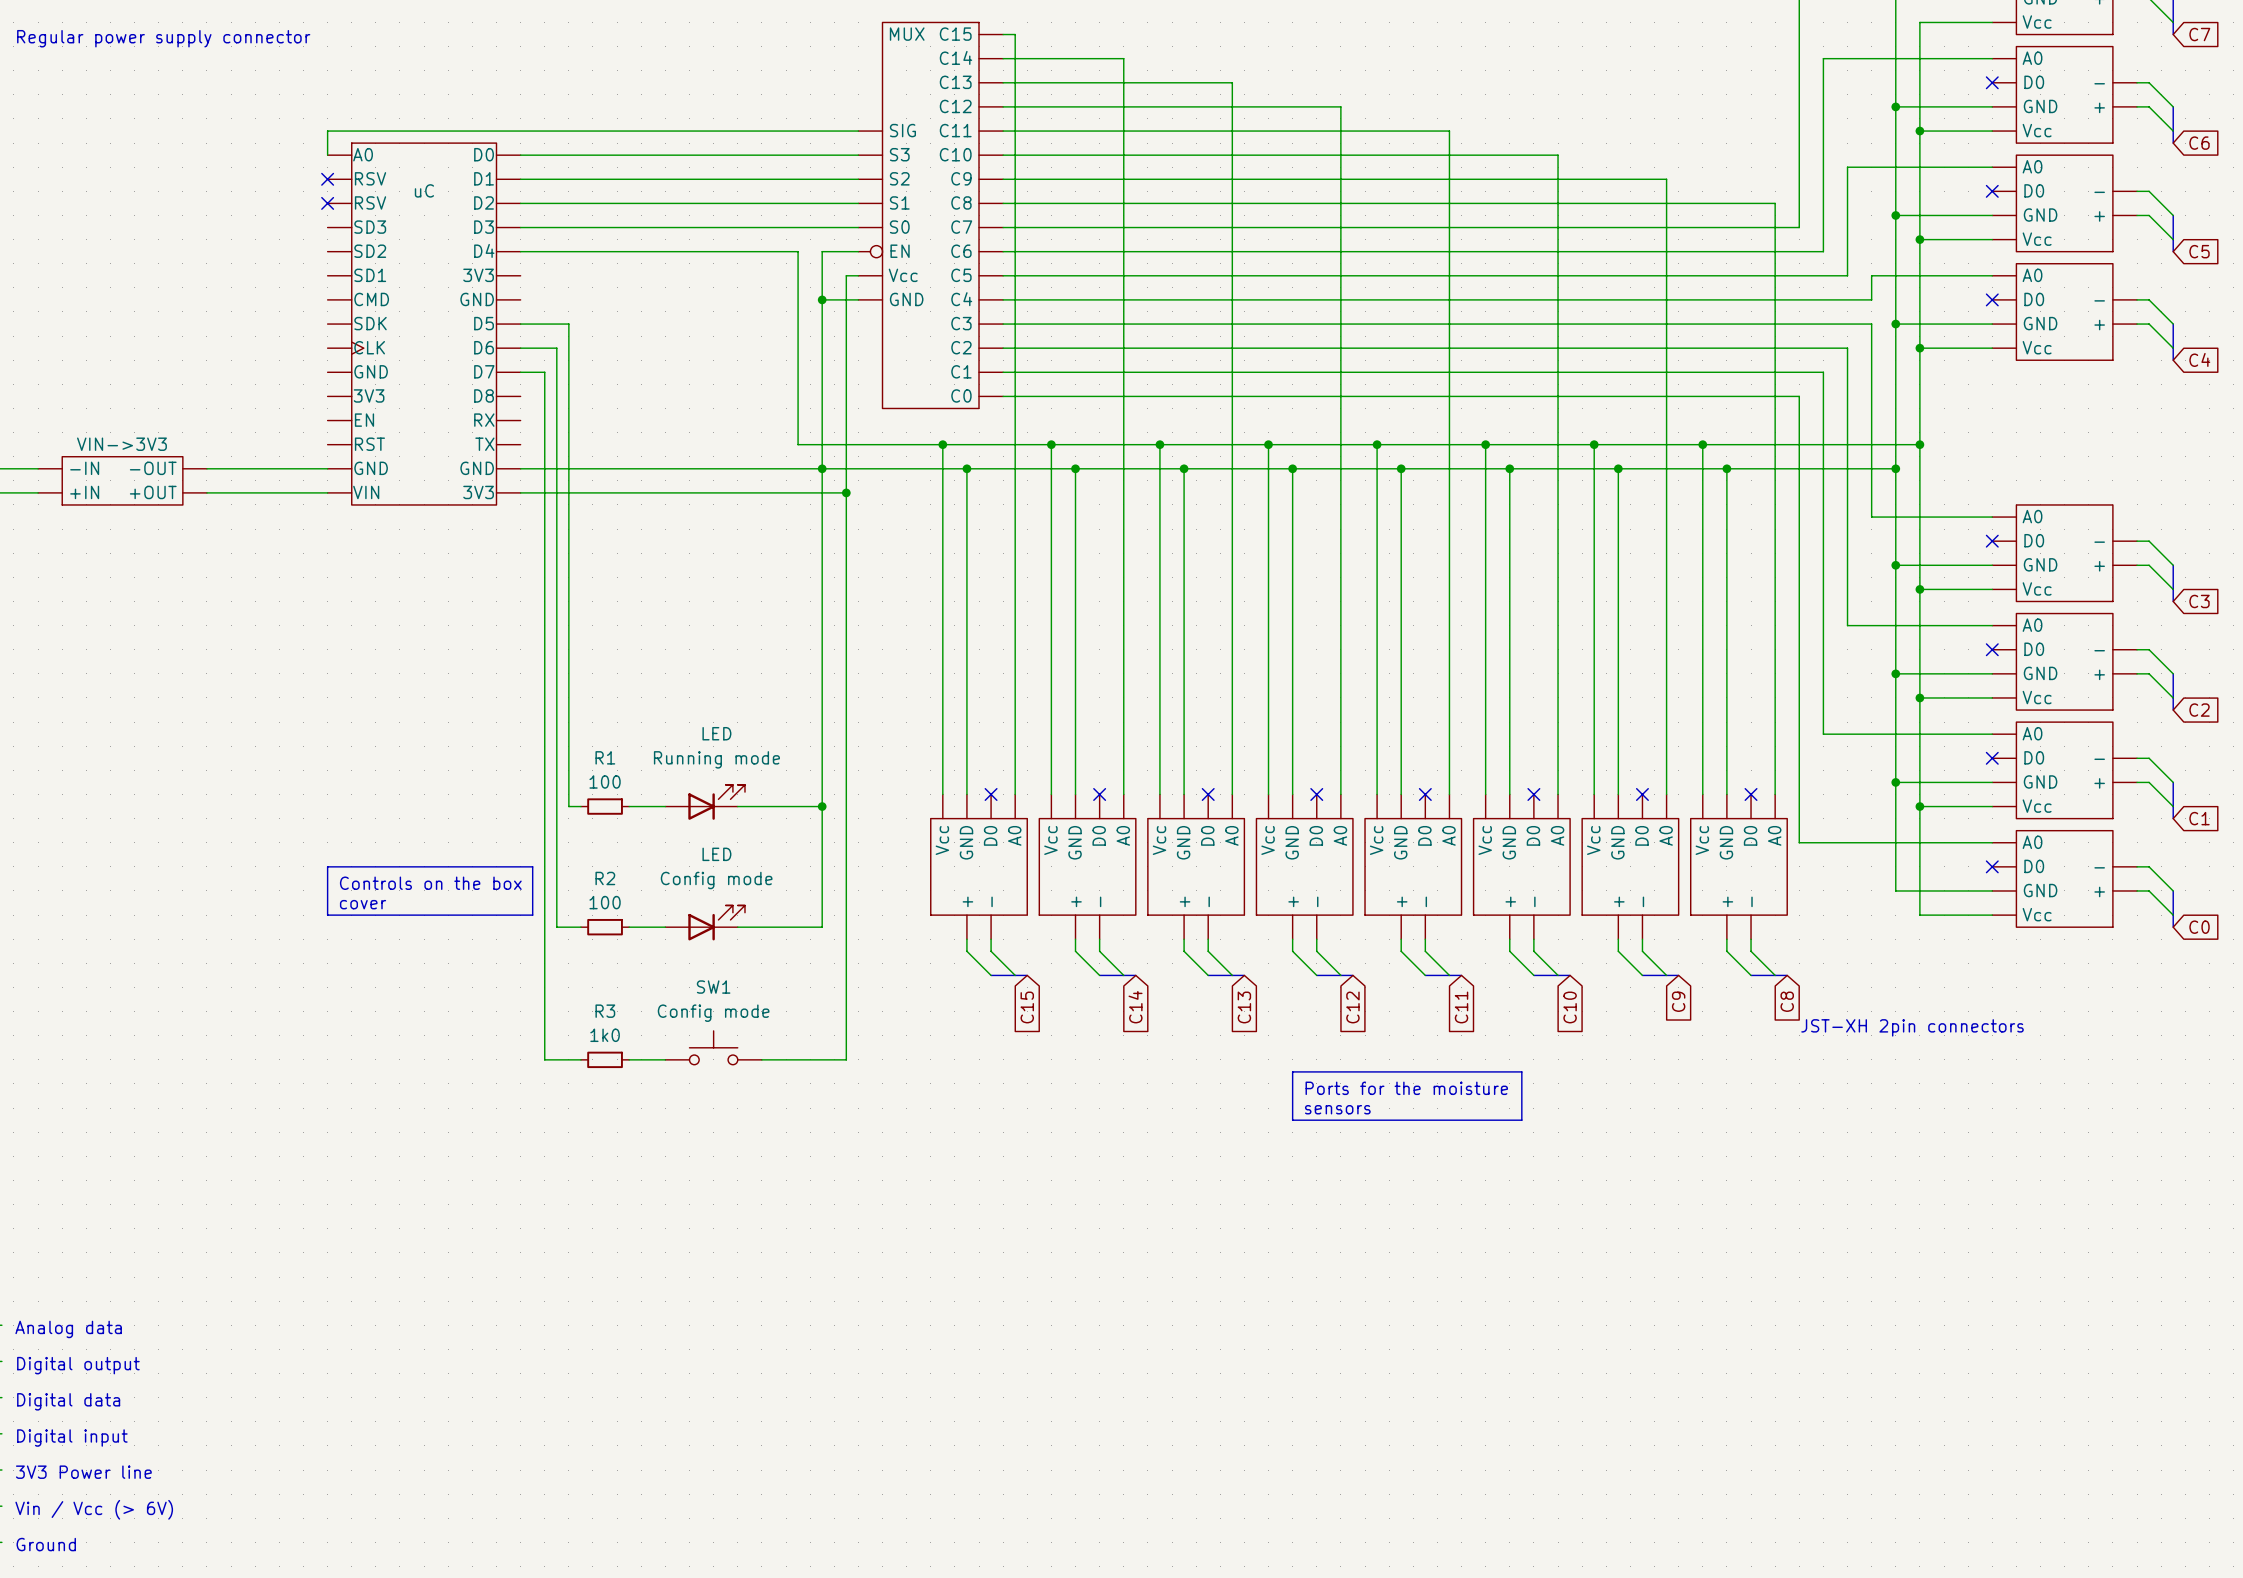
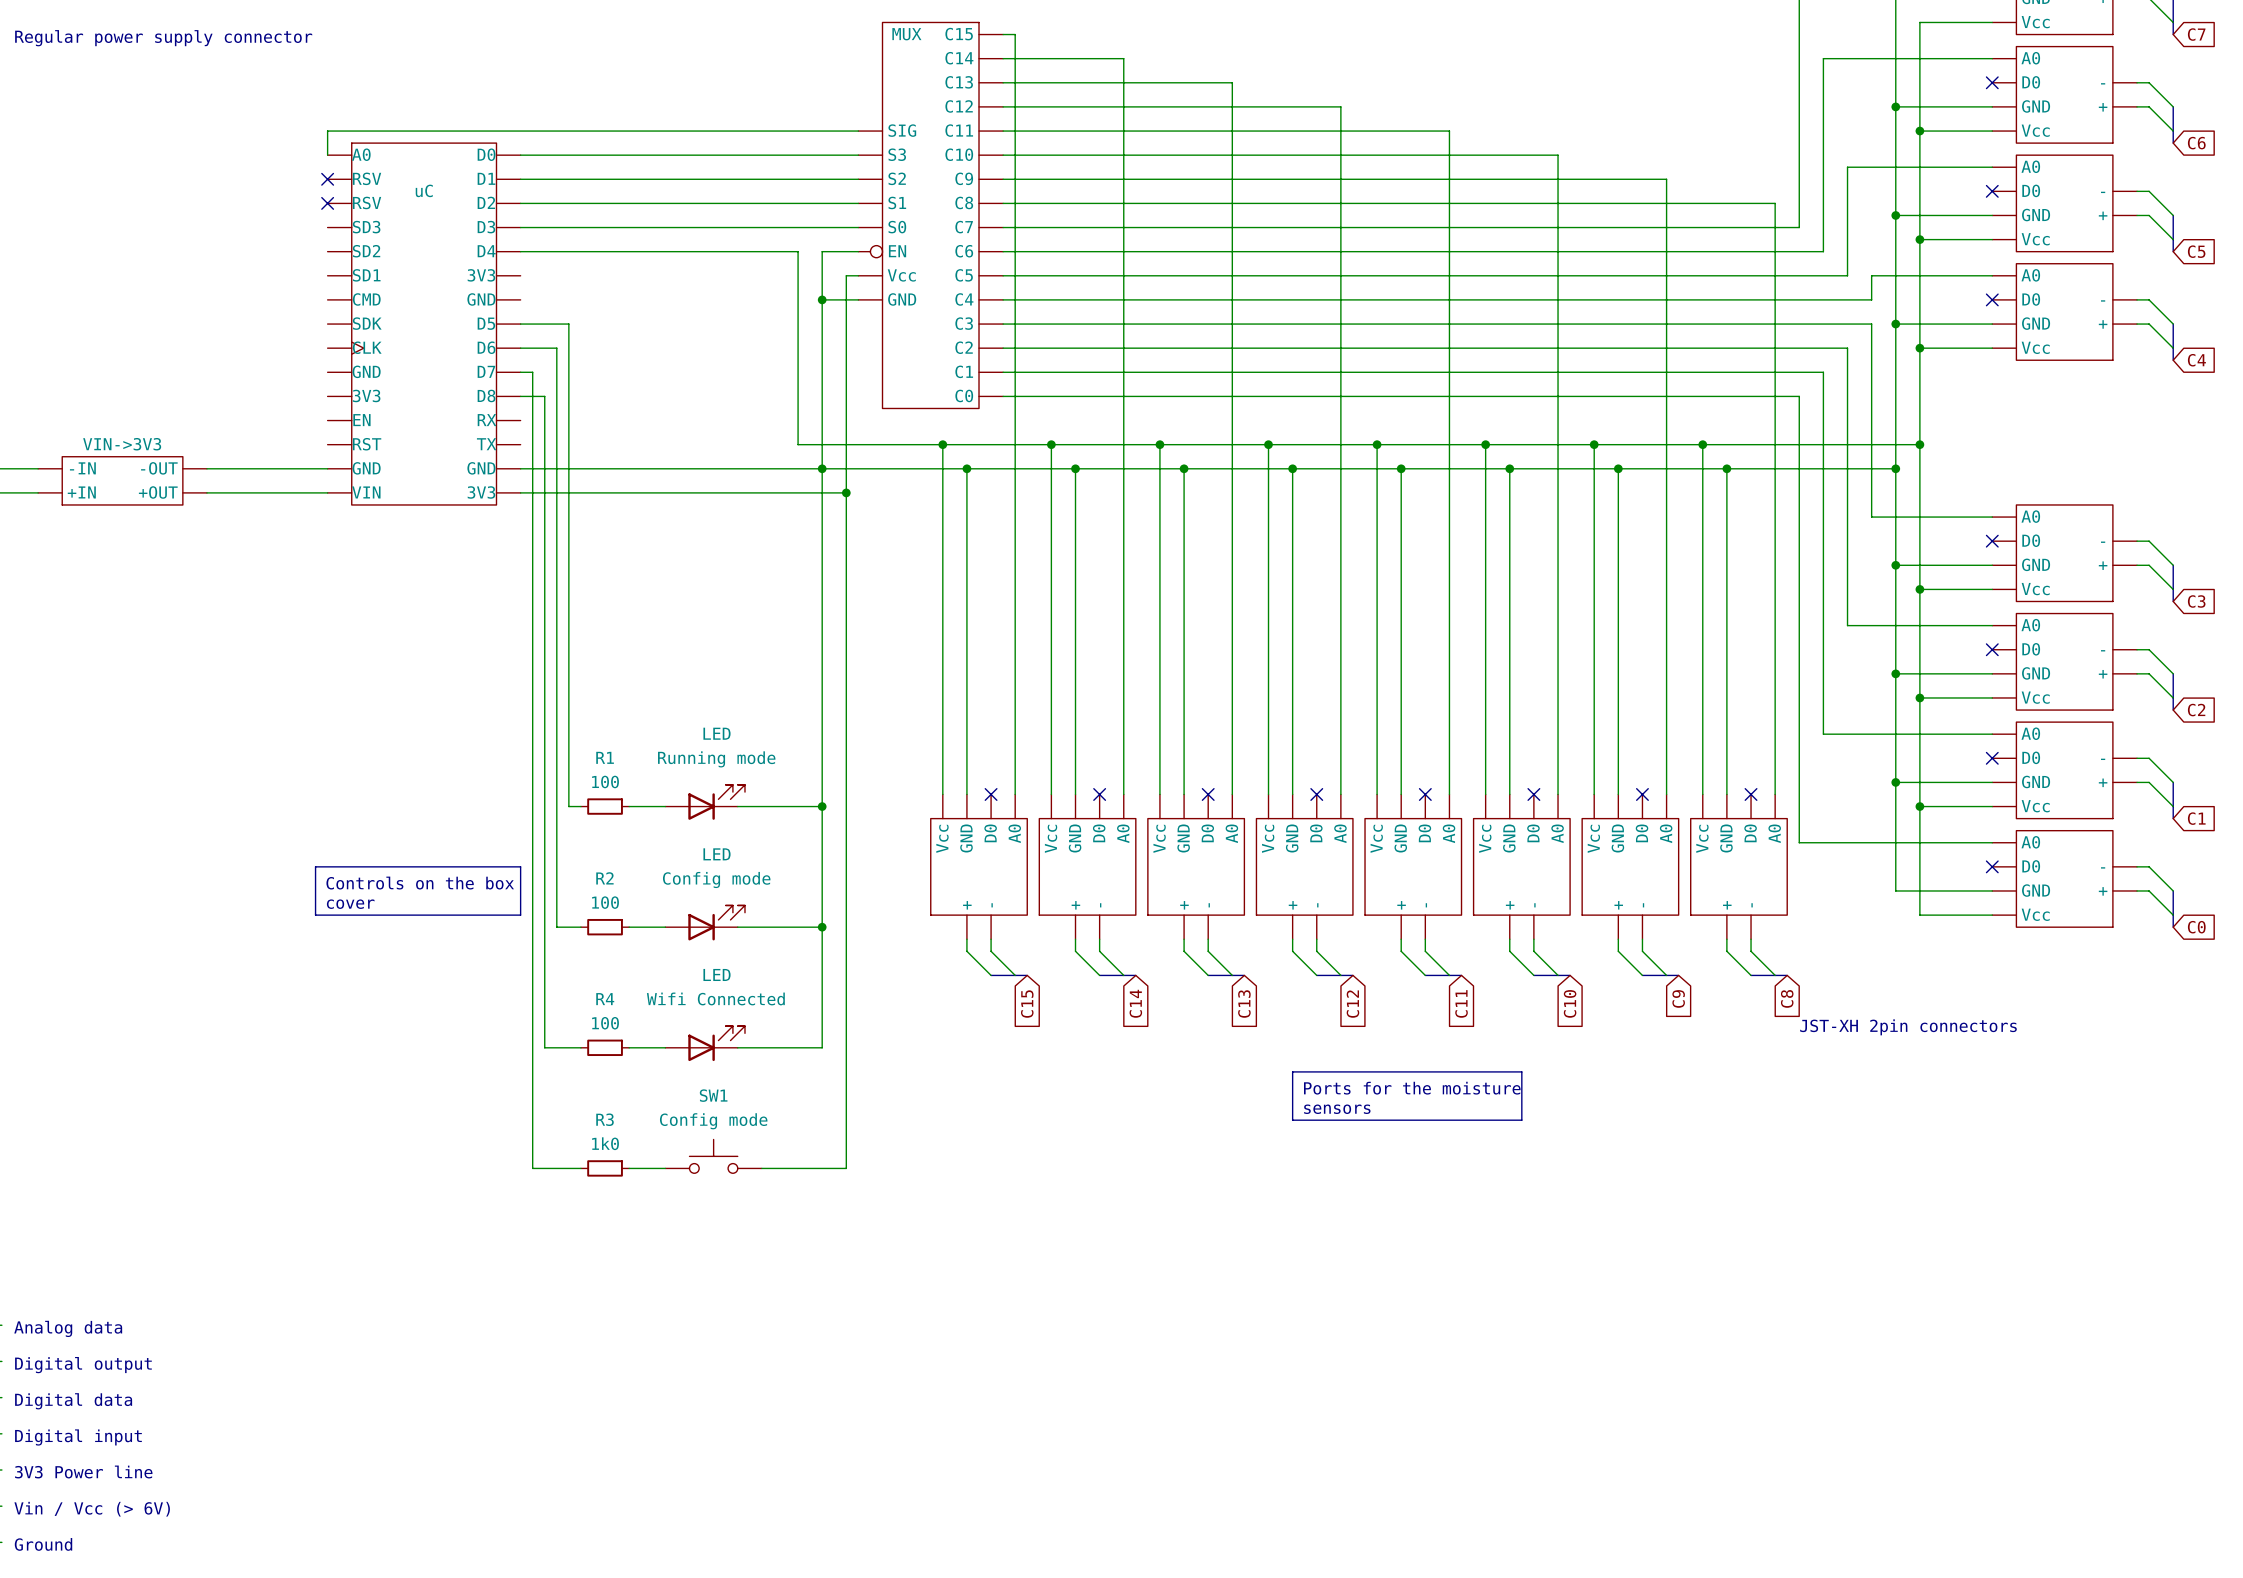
wire: (532, 372) (544, 372) (544, 396) -> (520, 396) (544, 396)
wire: none -> (532, 372) (532, 1168) (580, 1168)
line: (327, 866) (327, 915) -> (327, 866) (315, 866) (315, 915) (327, 915)
line: (520, 866) (532, 866) (532, 915) (520, 915) -> (520, 866) (520, 915)
text position: Controls on the box (430, 883) -> Controls on the box (420, 883)
text position: cover (363, 904) -> cover (350, 904)
wire: none -> (822, 927) (822, 1047) (737, 1047)
junction: none -> (822, 927)
LED: none -> Wifi Connected (705, 1043)
wire: (544, 1047) (544, 1059) (580, 1059) -> (544, 1047) (580, 1047)
R4: none -> 100 (605, 1047)
SW1 position: (713, 1047) -> (713, 1156)
R3 position: (605, 1059) -> (605, 1168)
wire: (629, 1059) (665, 1059) -> (629, 1047) (665, 1047)
wire: (761, 1059) (846, 1059) -> (761, 1168) (846, 1168) (846, 1059)
wire: none -> (629, 1168) (665, 1168)

